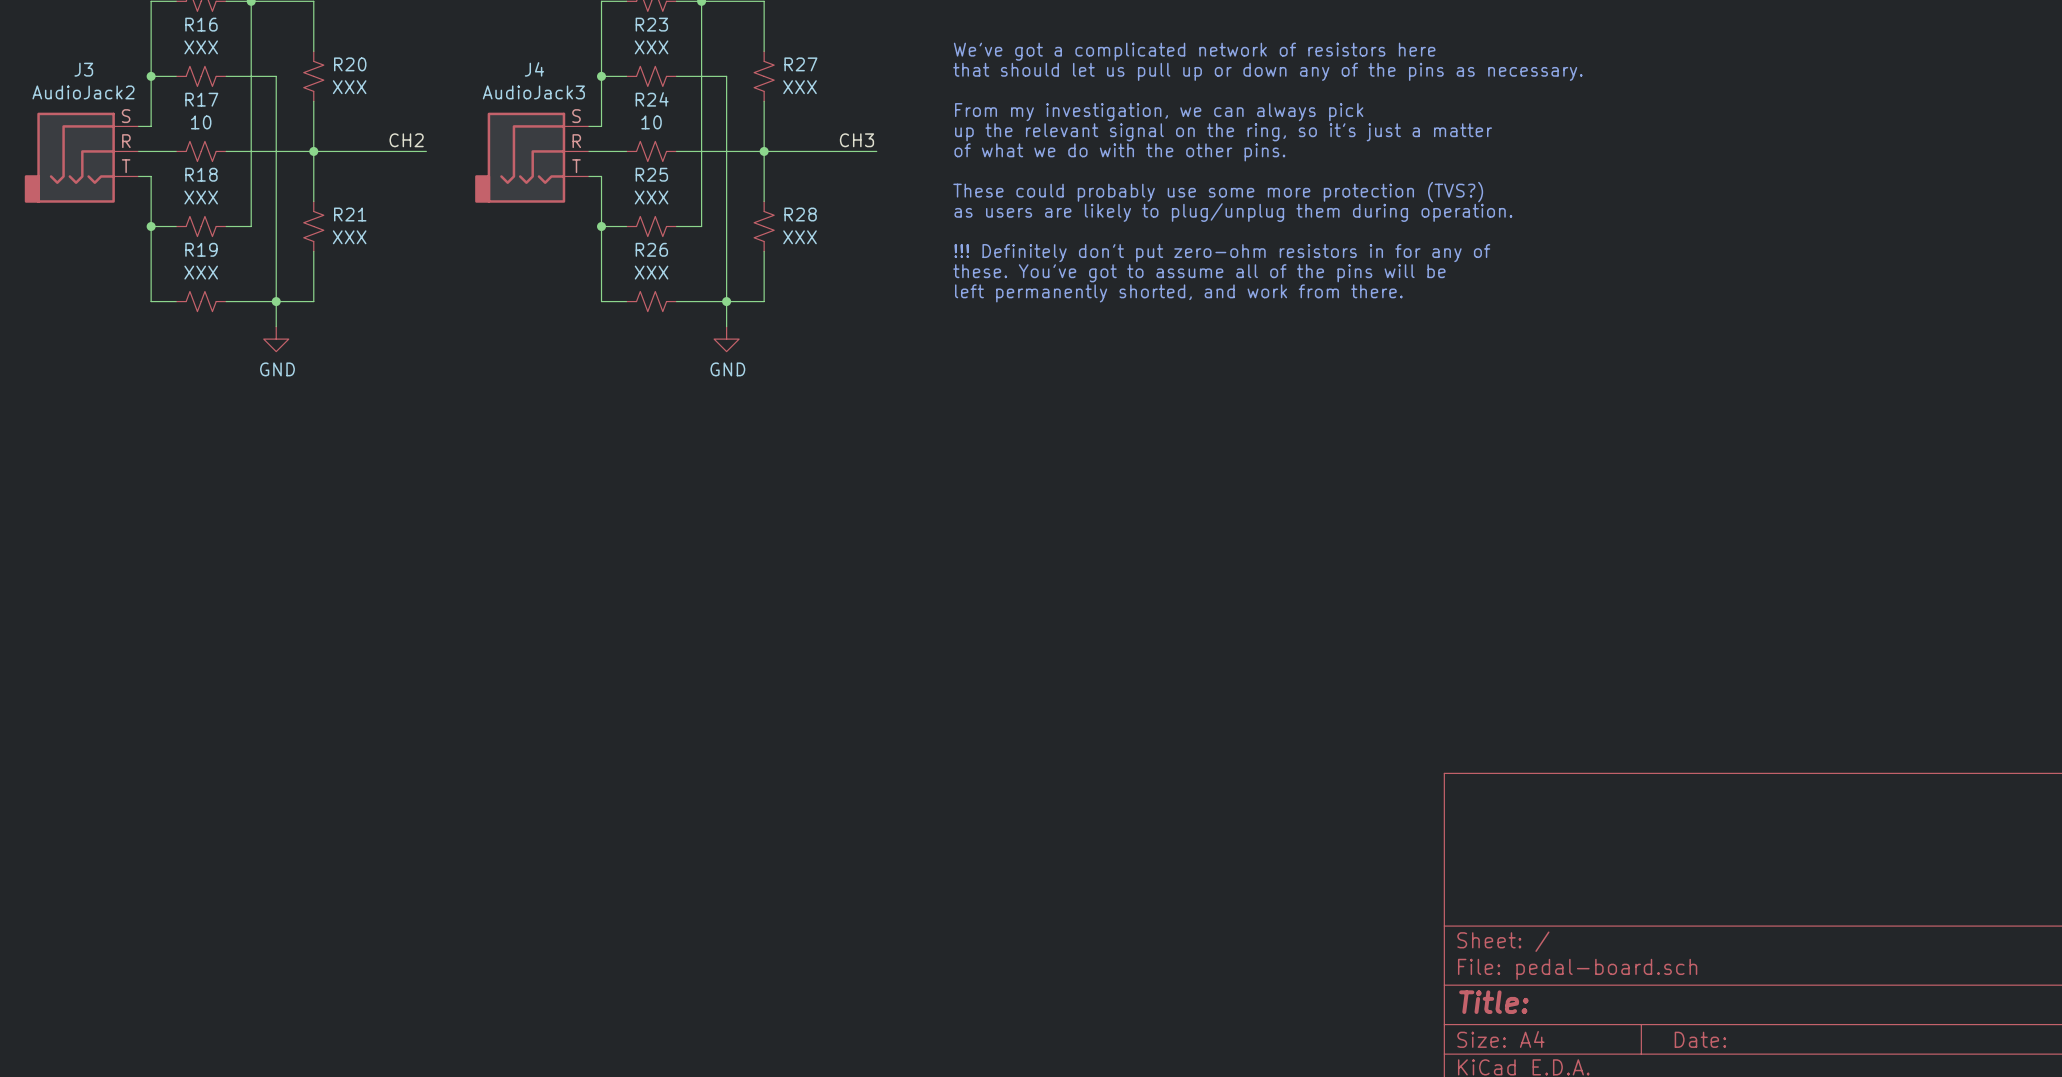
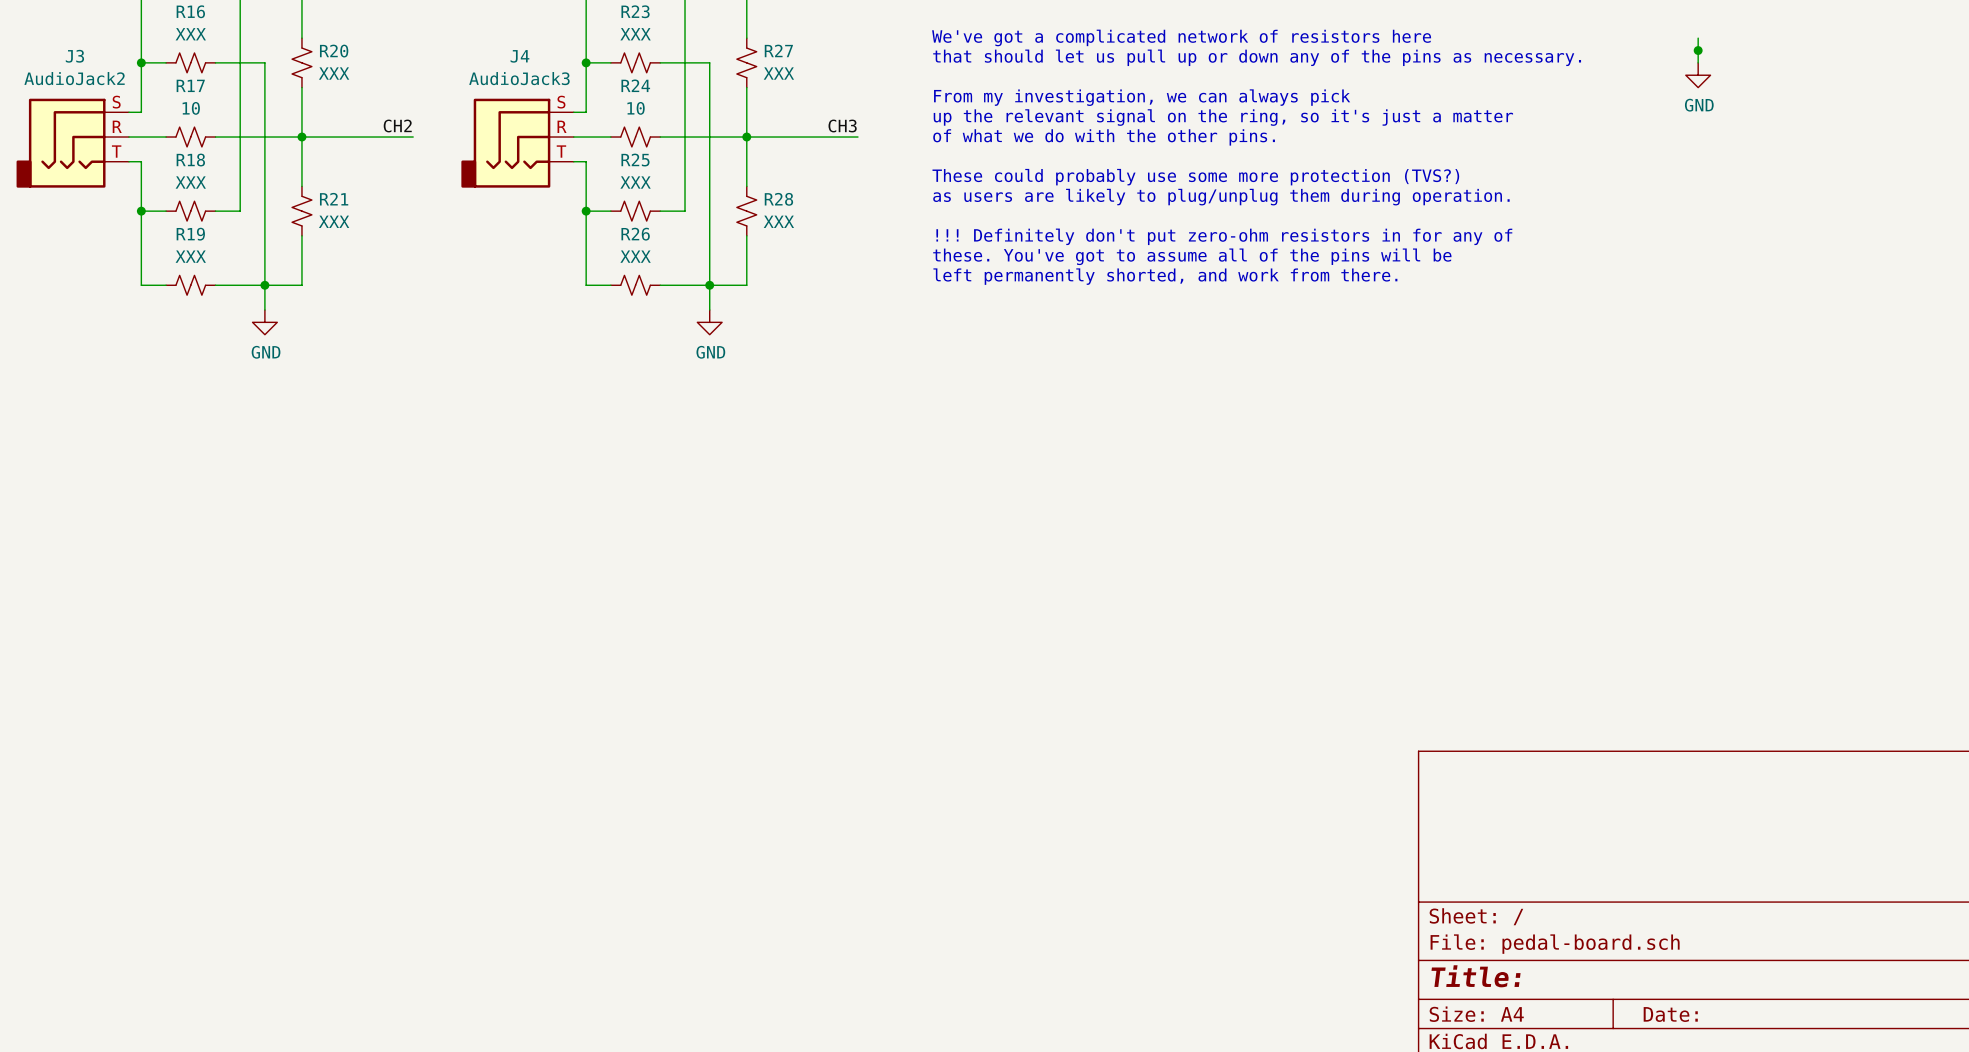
wire: none -> (1698, 38) (1698, 62)
junction: none -> (1698, 50)
power symbol: none -> GND (1698, 75)

